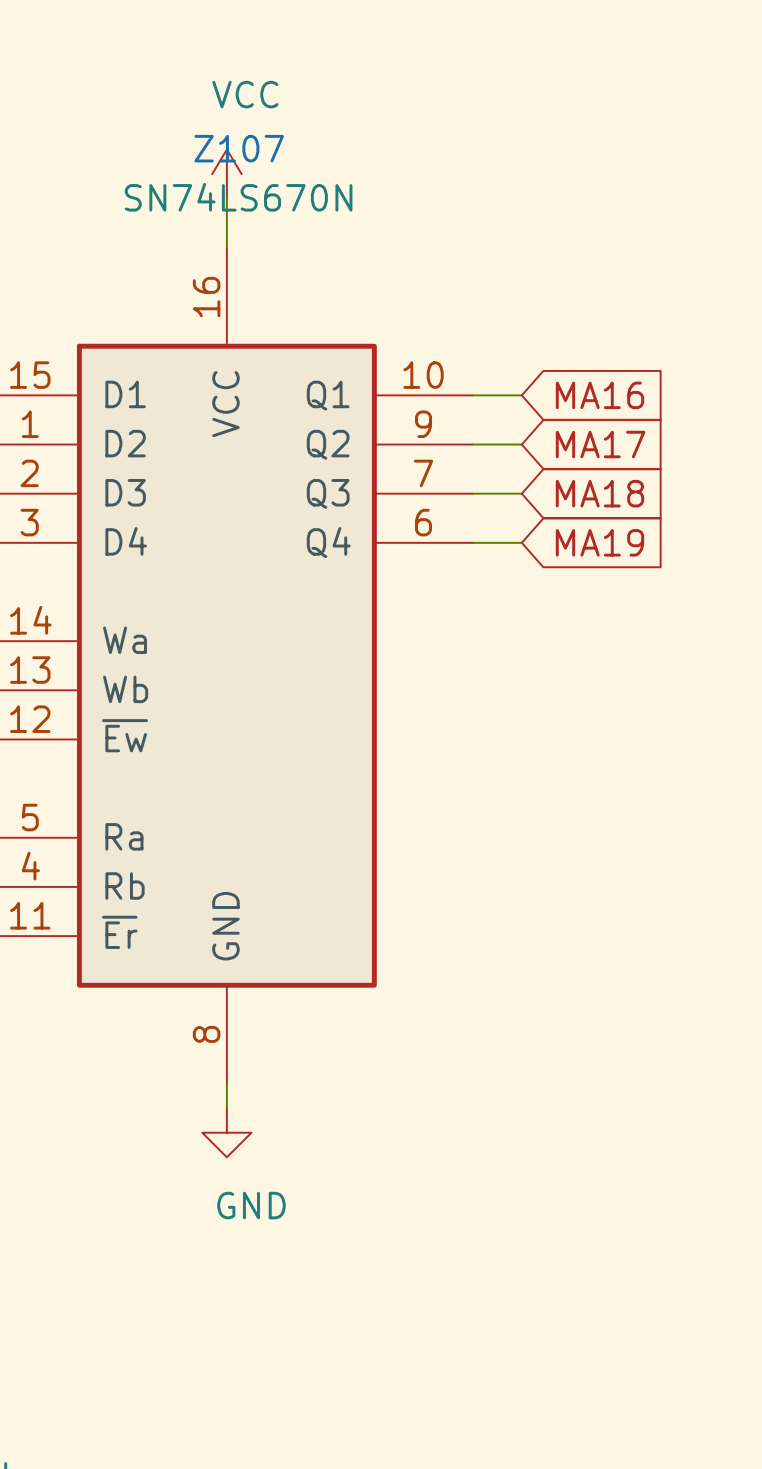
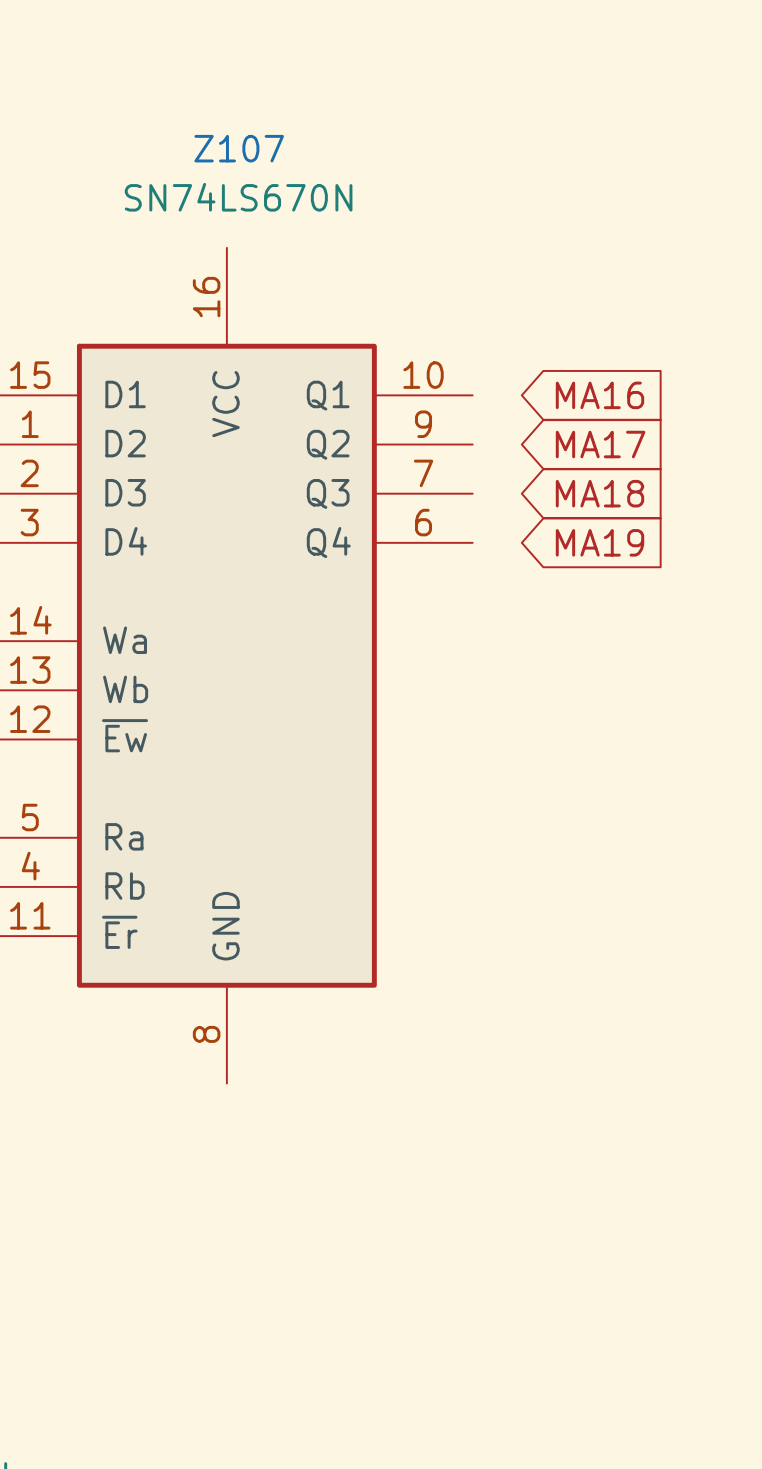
power symbol: VCC (226, 174) -> none
wire: (226, 198) (226, 247) -> none
wire: (472, 395) (521, 395) -> none
wire: (472, 444) (521, 444) -> none
wire: (472, 493) (521, 493) -> none
wire: (472, 542) (521, 542) -> none
wire: (226, 1083) (226, 1108) -> none
power symbol: GND (226, 1132) -> none

